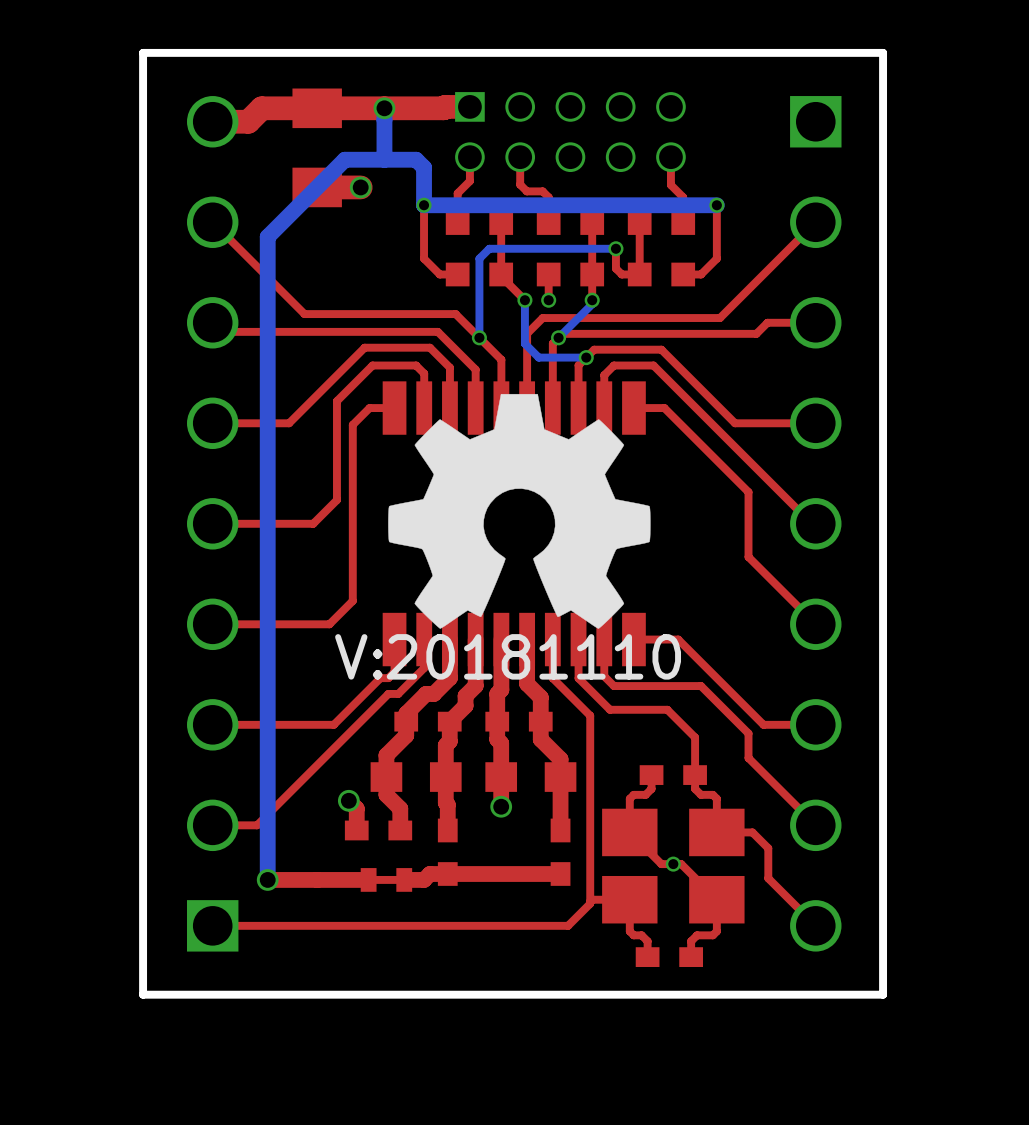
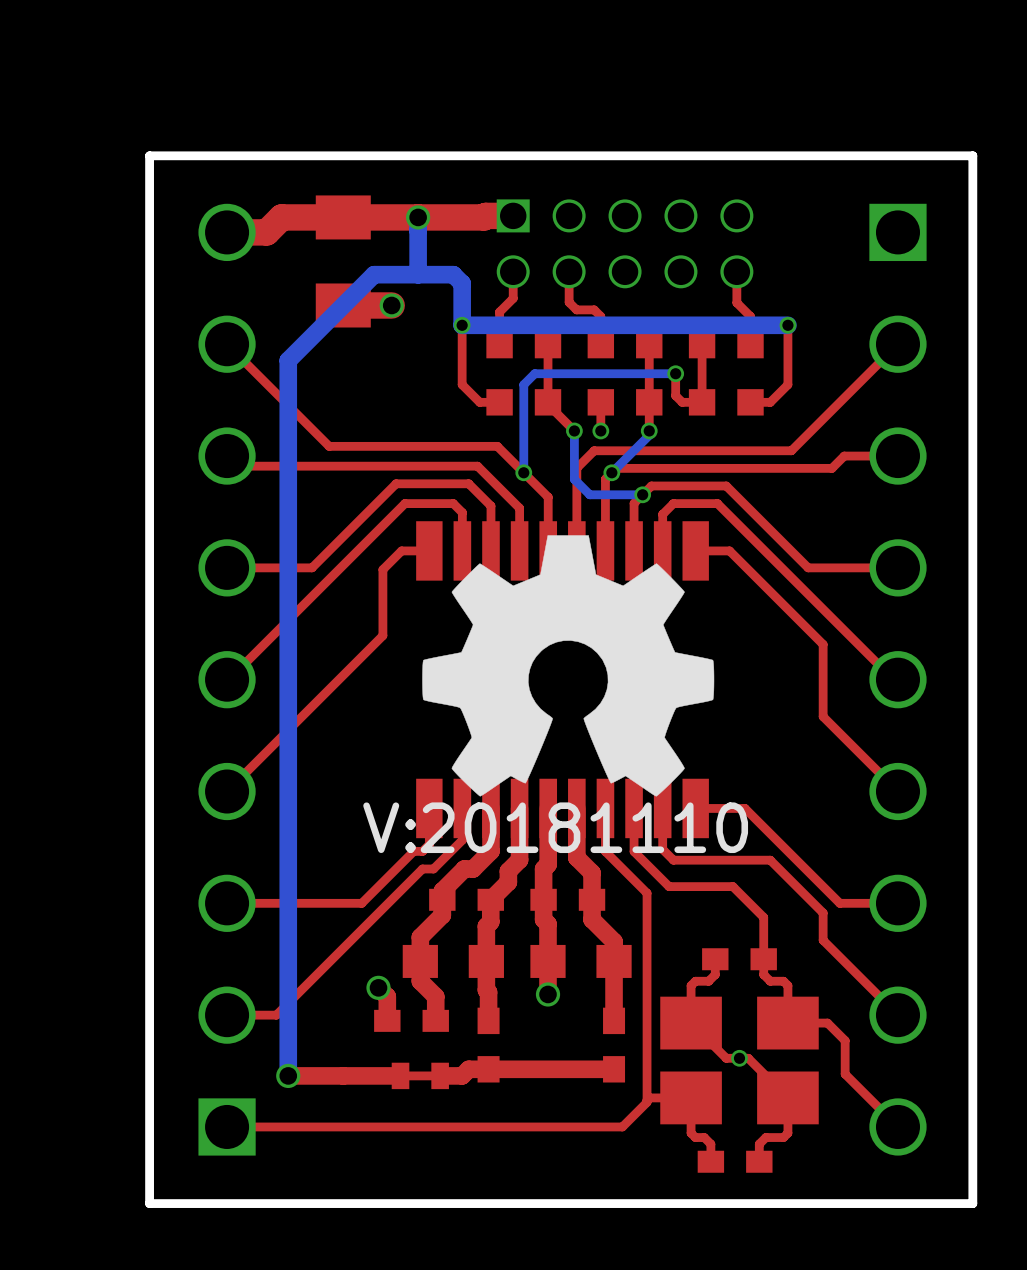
top track: (336, 401) (336, 500) -> (382, 635) (365, 653)
top track: (352, 484) (352, 600) (329, 624) (212, 624) -> (338, 679) (227, 791)
top track: (313, 523) (214, 523) -> (365, 543) (228, 679)

